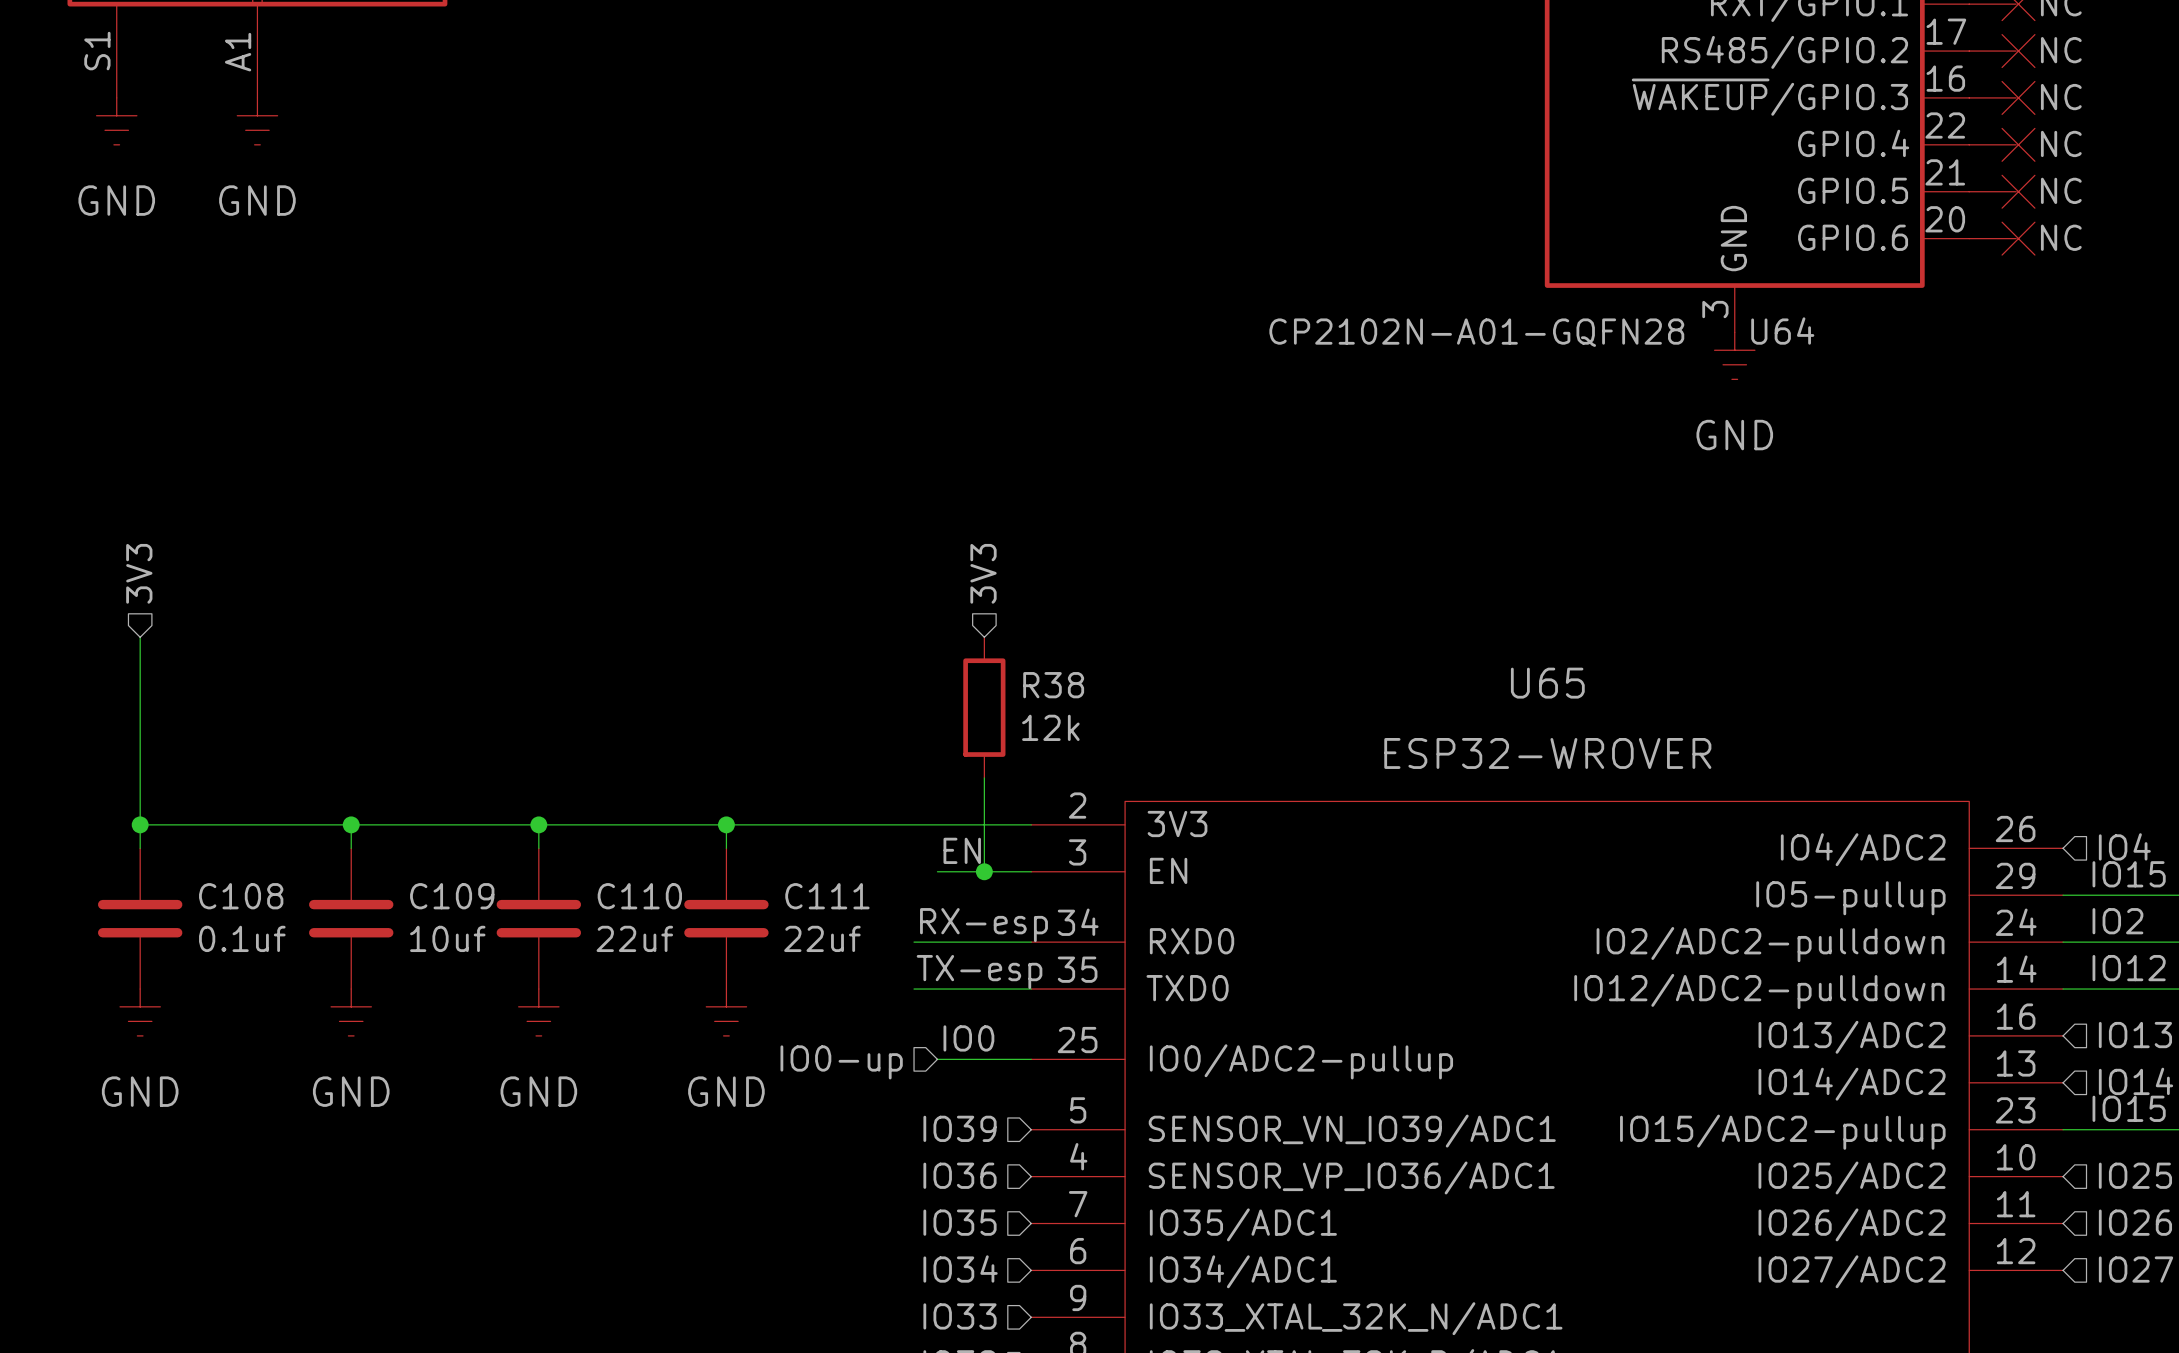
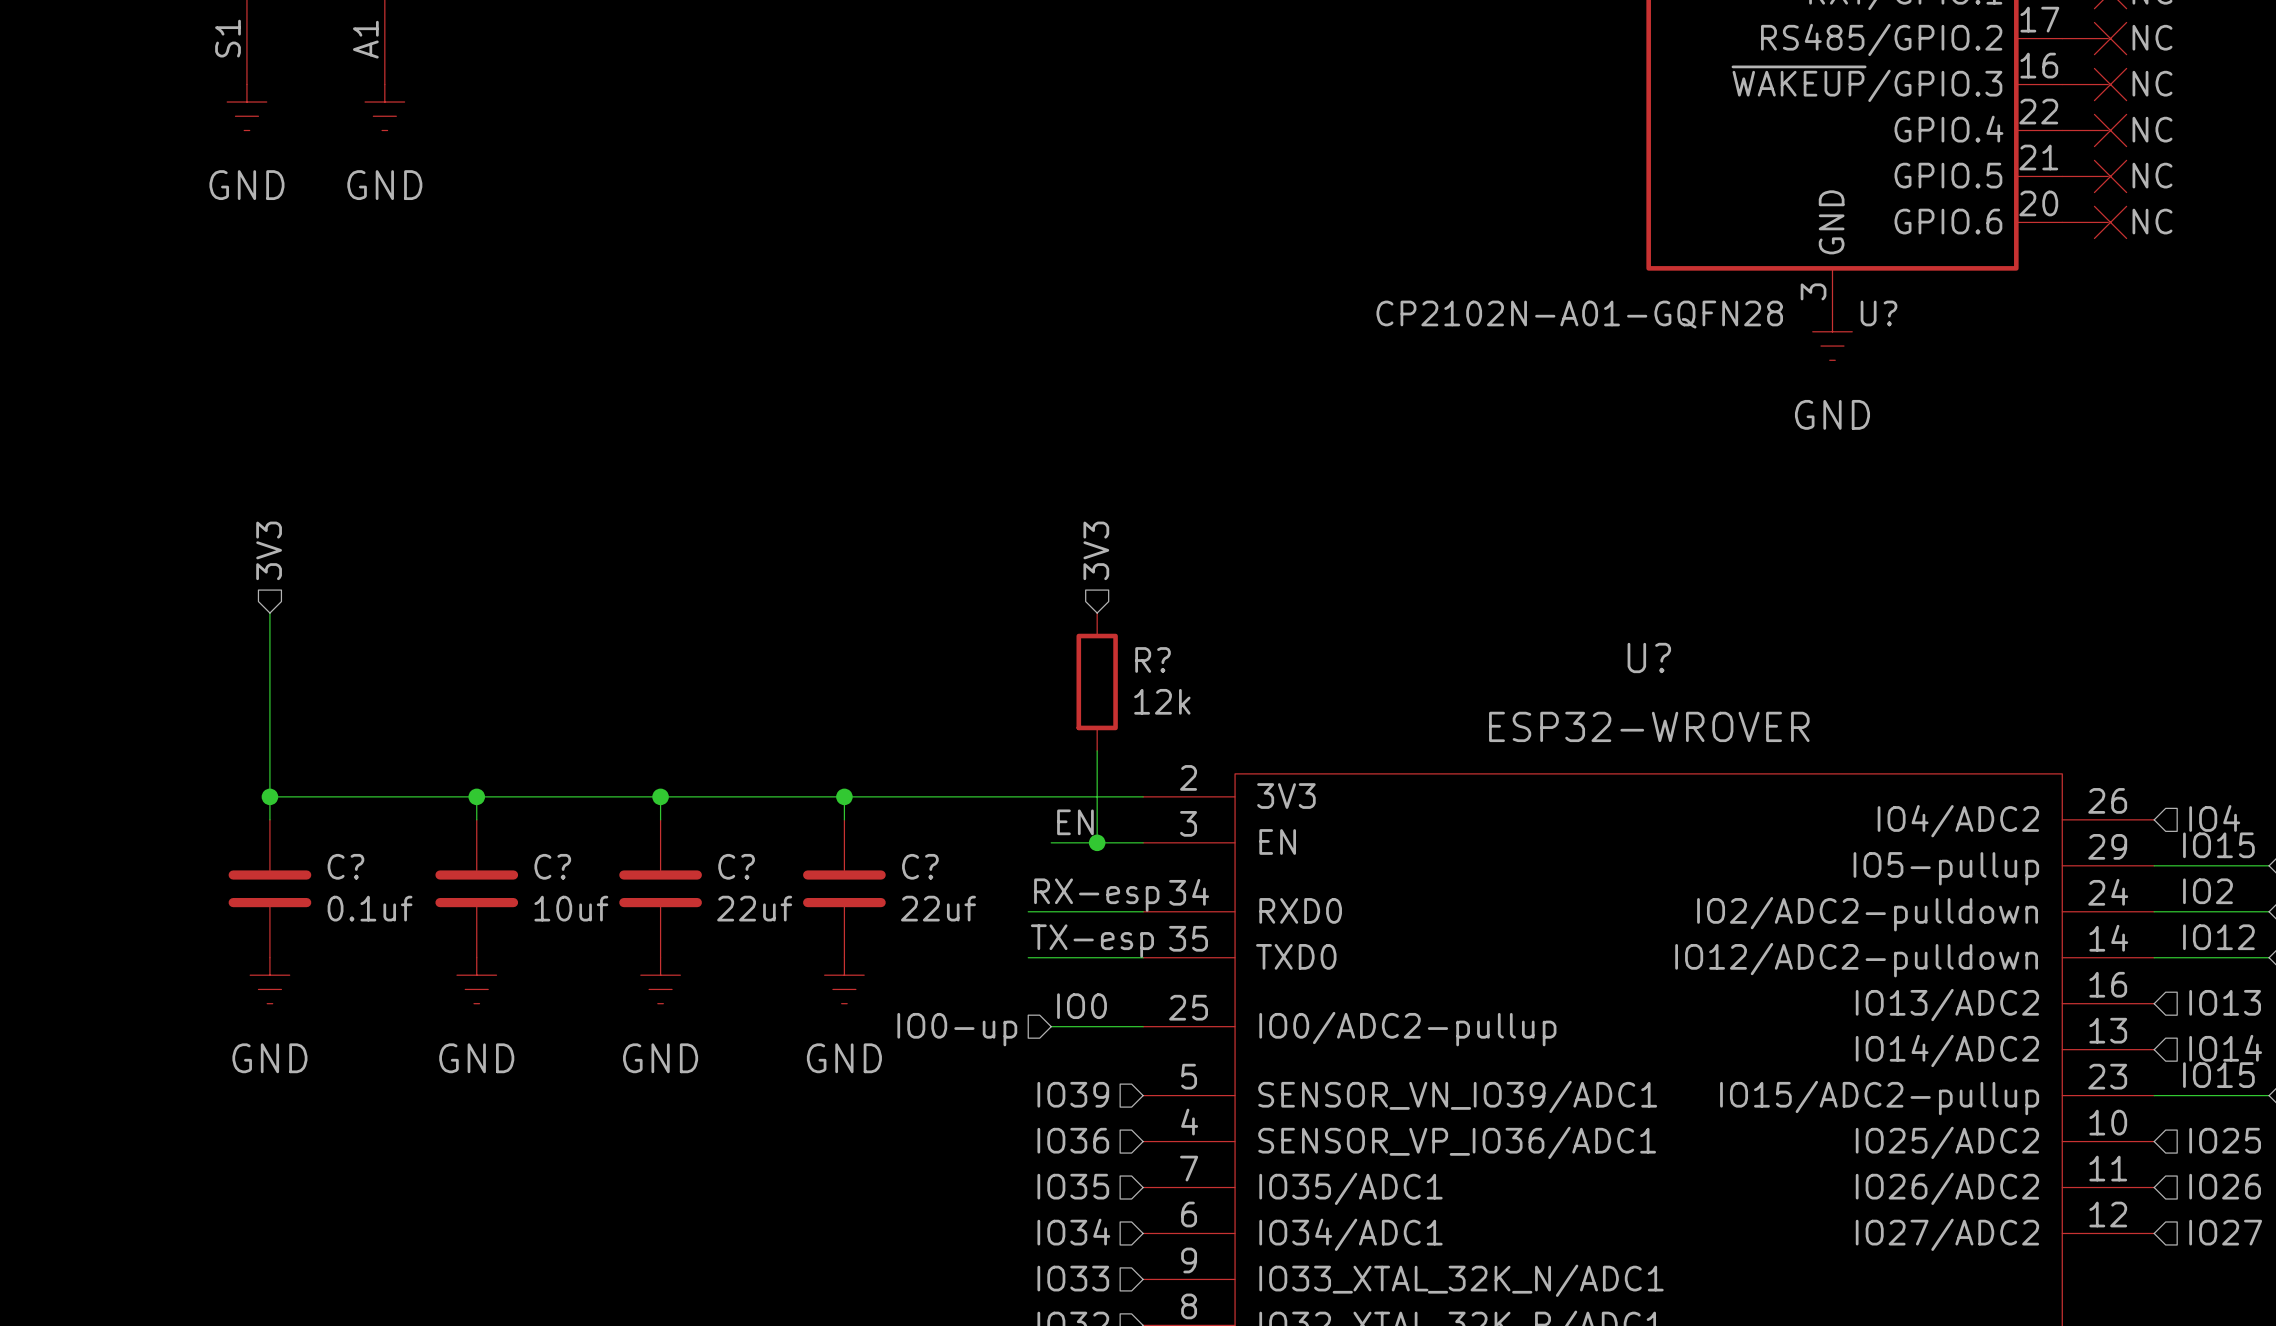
U64 name: U64 (1782, 331) -> U? (1878, 313)
U65 name: U65 (1547, 683) -> U? (1649, 657)
R38 name: R38 (1053, 685) -> R? (1153, 659)
C108 name: C108 (241, 896) -> C? (345, 866)
C109 name: C109 (452, 896) -> C? (552, 866)
C110 name: C110 (639, 896) -> C? (736, 866)
C111 name: C111 (827, 896) -> C? (920, 866)

